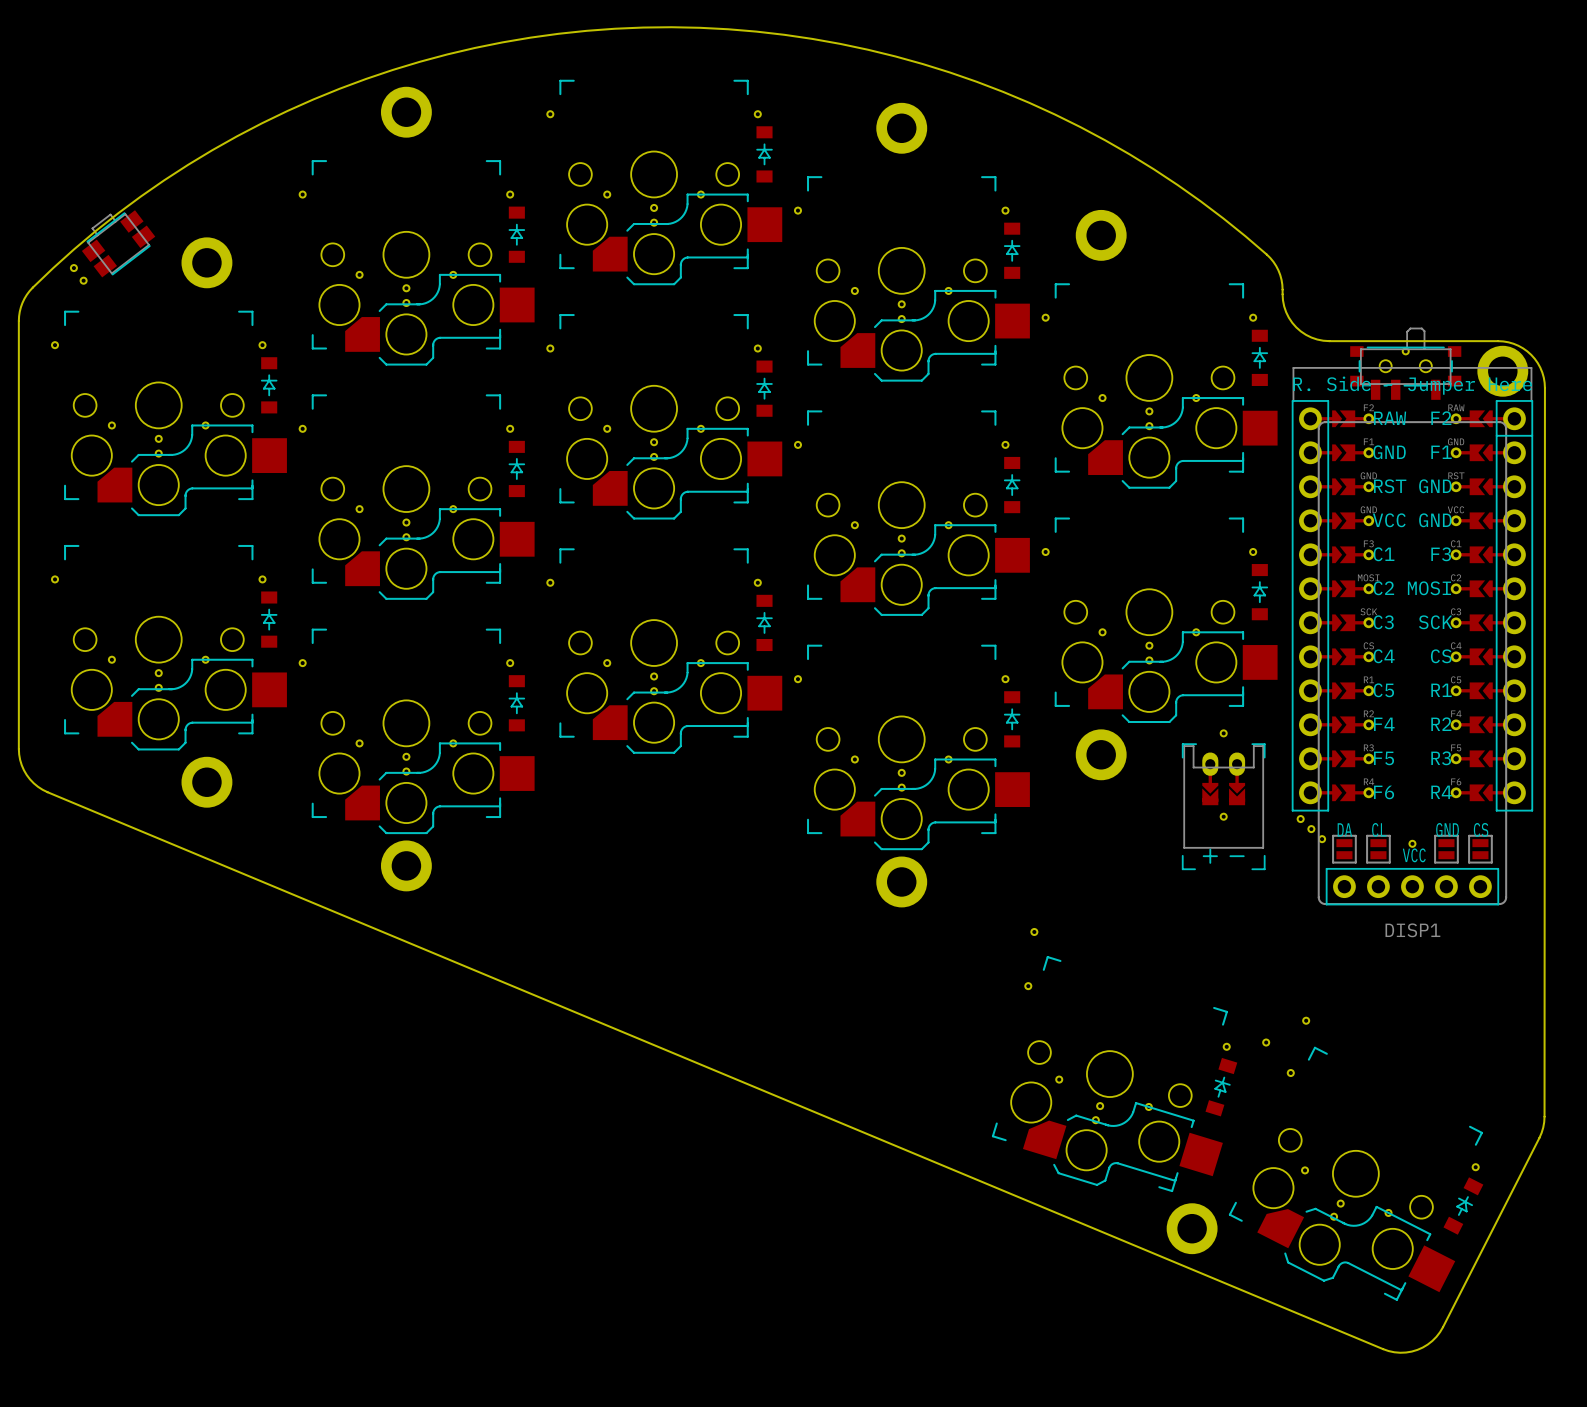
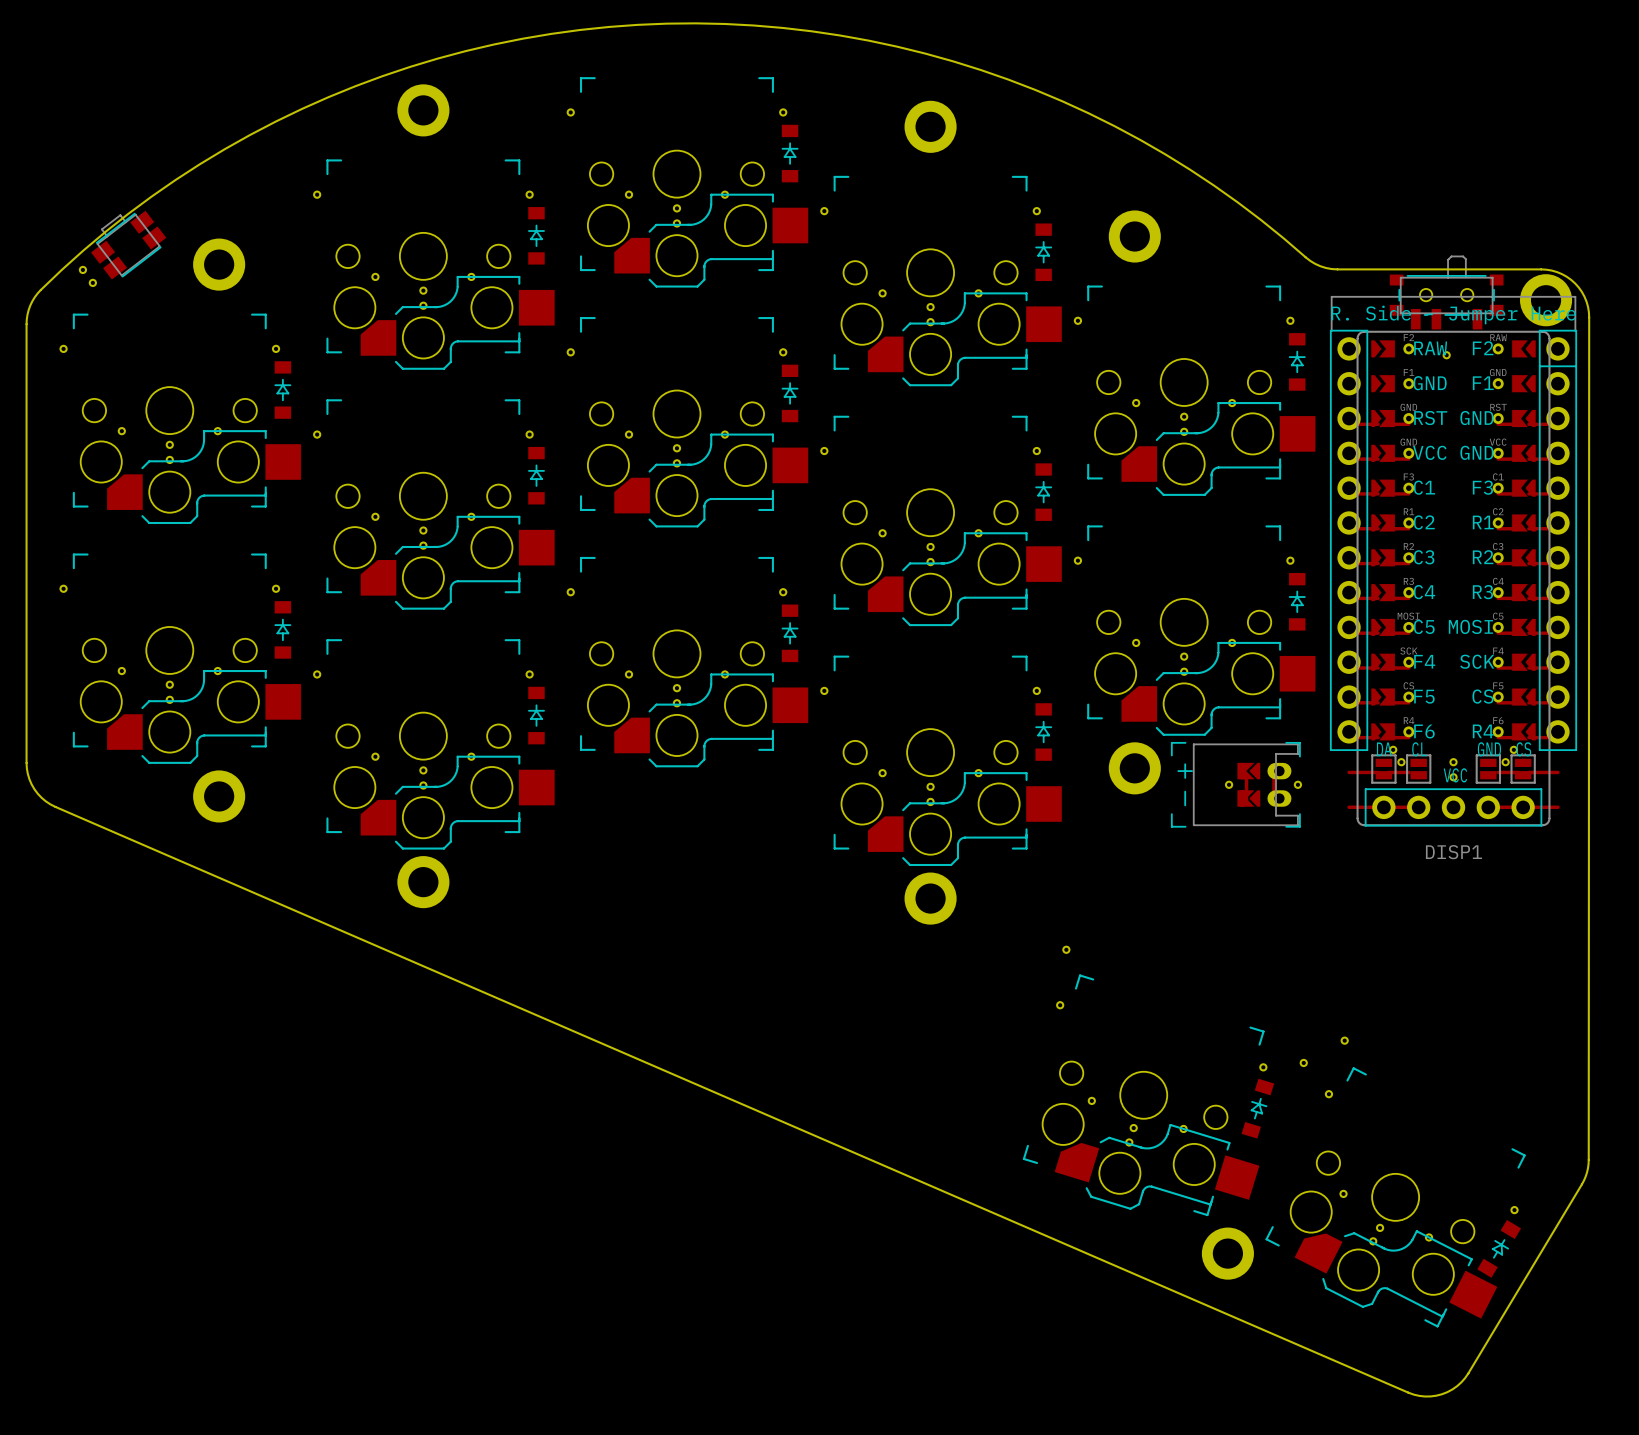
board edge: (32, 287) (95, 230) (140, 196) (187, 164) (236, 136) (287, 111) (366, 78) (447, 54) (530, 37) (586, 30) (643, 27) (728, 29) (812, 38) (868, 49) (949, 72) (1029, 102) (1080, 127) (1153, 169) (1200, 201) (1245, 236) (1266, 254) (1276, 266) (1281, 279) (1286, 312) (1292, 322) (1306, 334) (1317, 339) (1329, 341) (1508, 342) (1523, 348) (1534, 358) (1542, 372) (1544, 388) -> (40, 289) (83, 250) (128, 213) (199, 164) (250, 135) (301, 108) (382, 76) (437, 58) (494, 44) (579, 29) (666, 23) (753, 25) (840, 35) (925, 53) (1008, 79) (1062, 101) (1114, 126) (1190, 169) (1261, 220) (1310, 260) (1326, 267) (1541, 269) (1562, 274) (1578, 287) (1588, 306) (1589, 392)
part position: (1405, 363) -> (1446, 292)
part position: (1502, 371) -> (1546, 300)
part: none -> (1453, 523)
part: (1412, 589) -> none
DISP1 position: (1412, 663) -> (1453, 578)
part: (1223, 733) -> none
part: none -> (1393, 749)
part: none -> (1513, 749)
part: none -> (1401, 762)
part: none -> (1453, 762)
part: none -> (1505, 762)
board edge: (18, 749) (20, 759) (26, 774) (33, 783) (47, 792) (1388, 1351) (1406, 1352) (1417, 1349) (1427, 1344) (1440, 1332) (1539, 1137) (1544, 1116) -> (26, 762) (27, 773) (34, 789) (41, 797) (55, 806) (1413, 1394) (1424, 1396) (1441, 1394) (1457, 1386) (1468, 1373) (1583, 1180) (1588, 1164) (1588, 1138)
part: none -> (1453, 777)
part: none -> (1229, 784)
part: none -> (1297, 784)
part rotation: 0° (1223, 806) -> 90° clockwise (1235, 784)
part: (1223, 816) -> none
part: (1300, 819) -> none
part: (1311, 829) -> none
part: (1322, 839) -> none
part: (1412, 843) -> none
part position: (1475, 1167) -> (1514, 1210)
part: (1463, 1206) -> none
part: none -> (1499, 1248)

